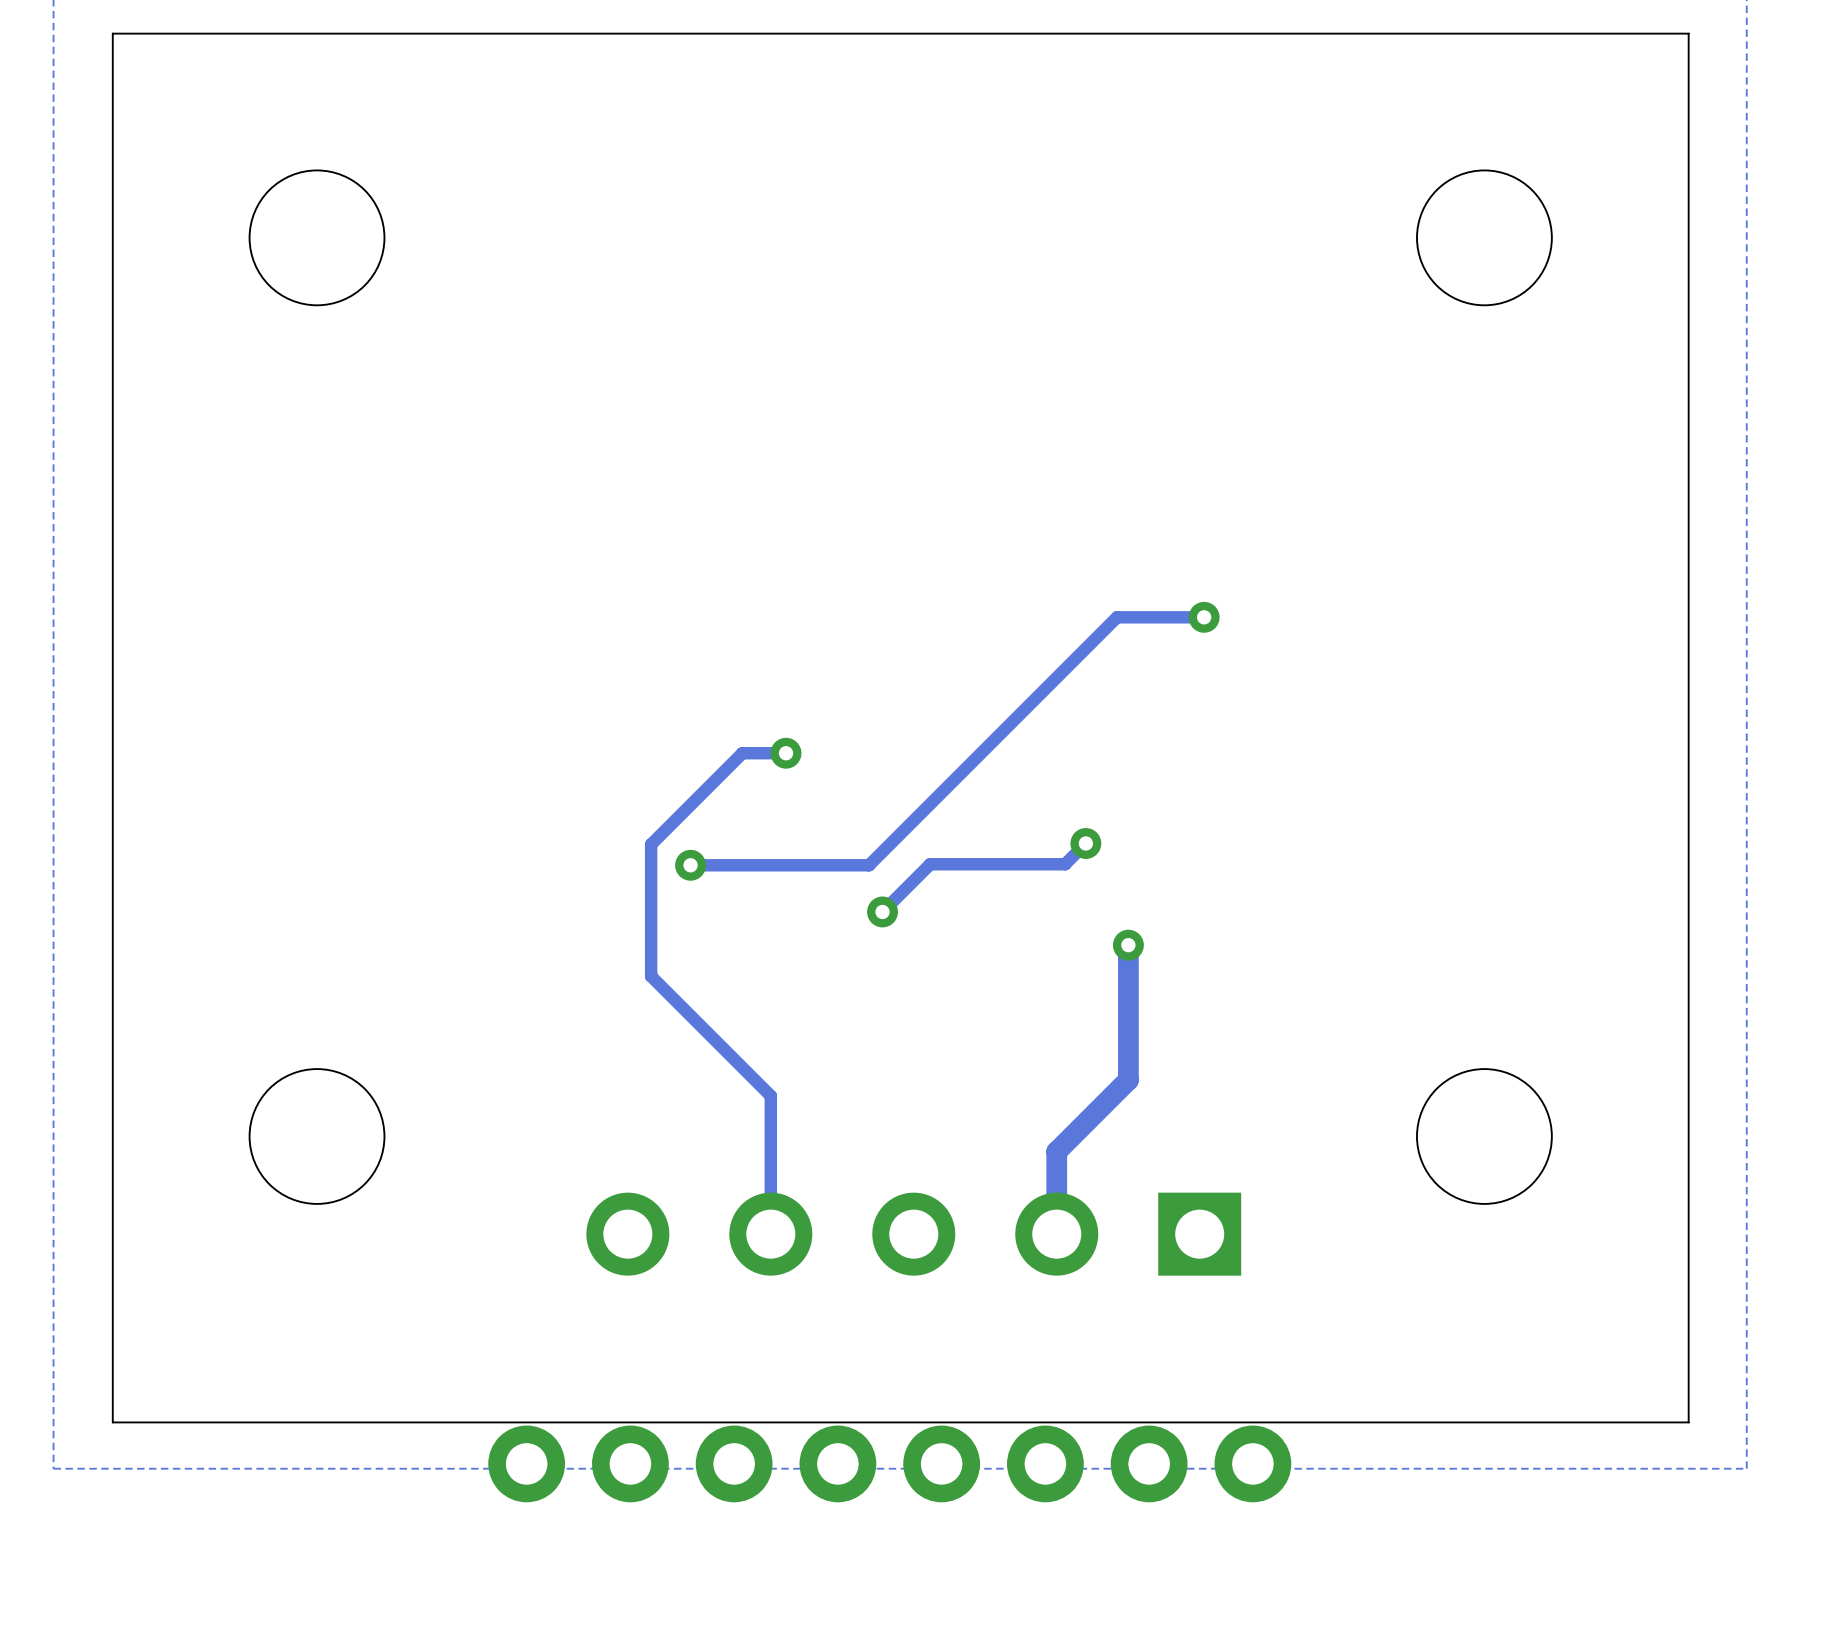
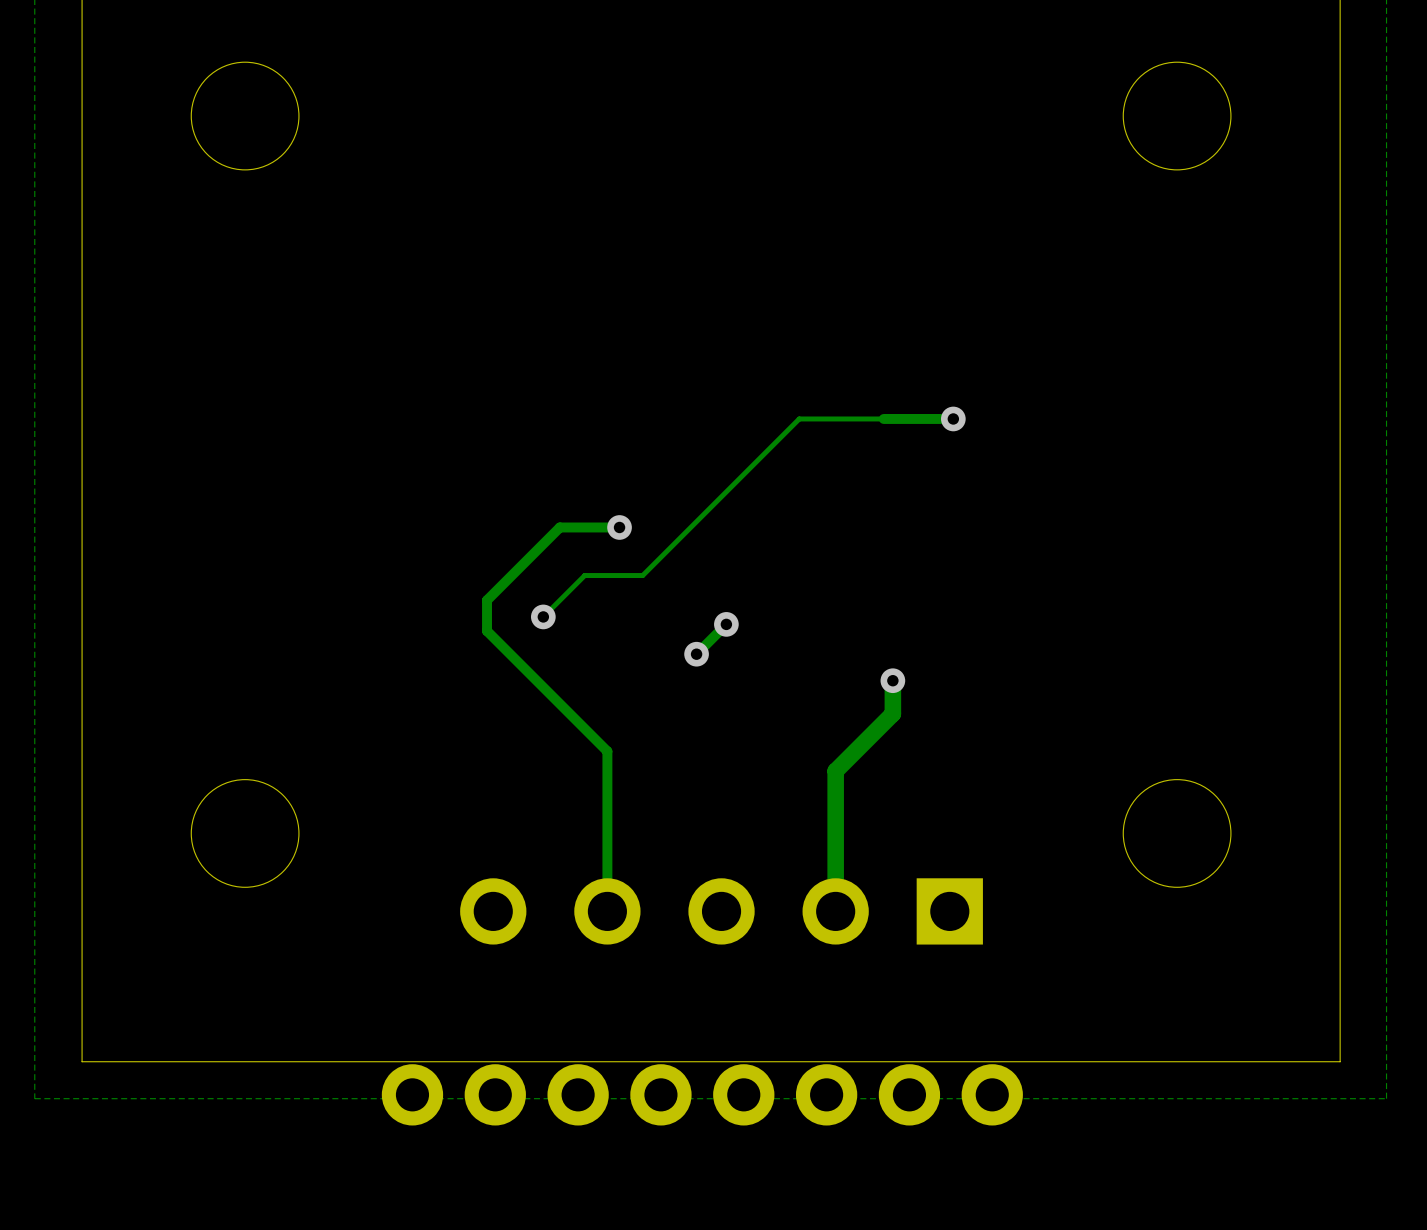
track: (1117, 617) (869, 865) (690, 865) -> (883, 418) (799, 418) (642, 575) (584, 575) (543, 616)
track: (742, 753) (651, 844) (651, 976) (770, 1095) -> (584, 527) (559, 527) (487, 600) (487, 631) (607, 751) (607, 801)
track: (1085, 843) (1065, 864) (930, 864) (919, 874) -> none
via position: (1085, 843) -> (726, 624)
track: (1128, 986) (1128, 1080) (1056, 1151) -> (892, 713) (835, 771) (835, 845)

